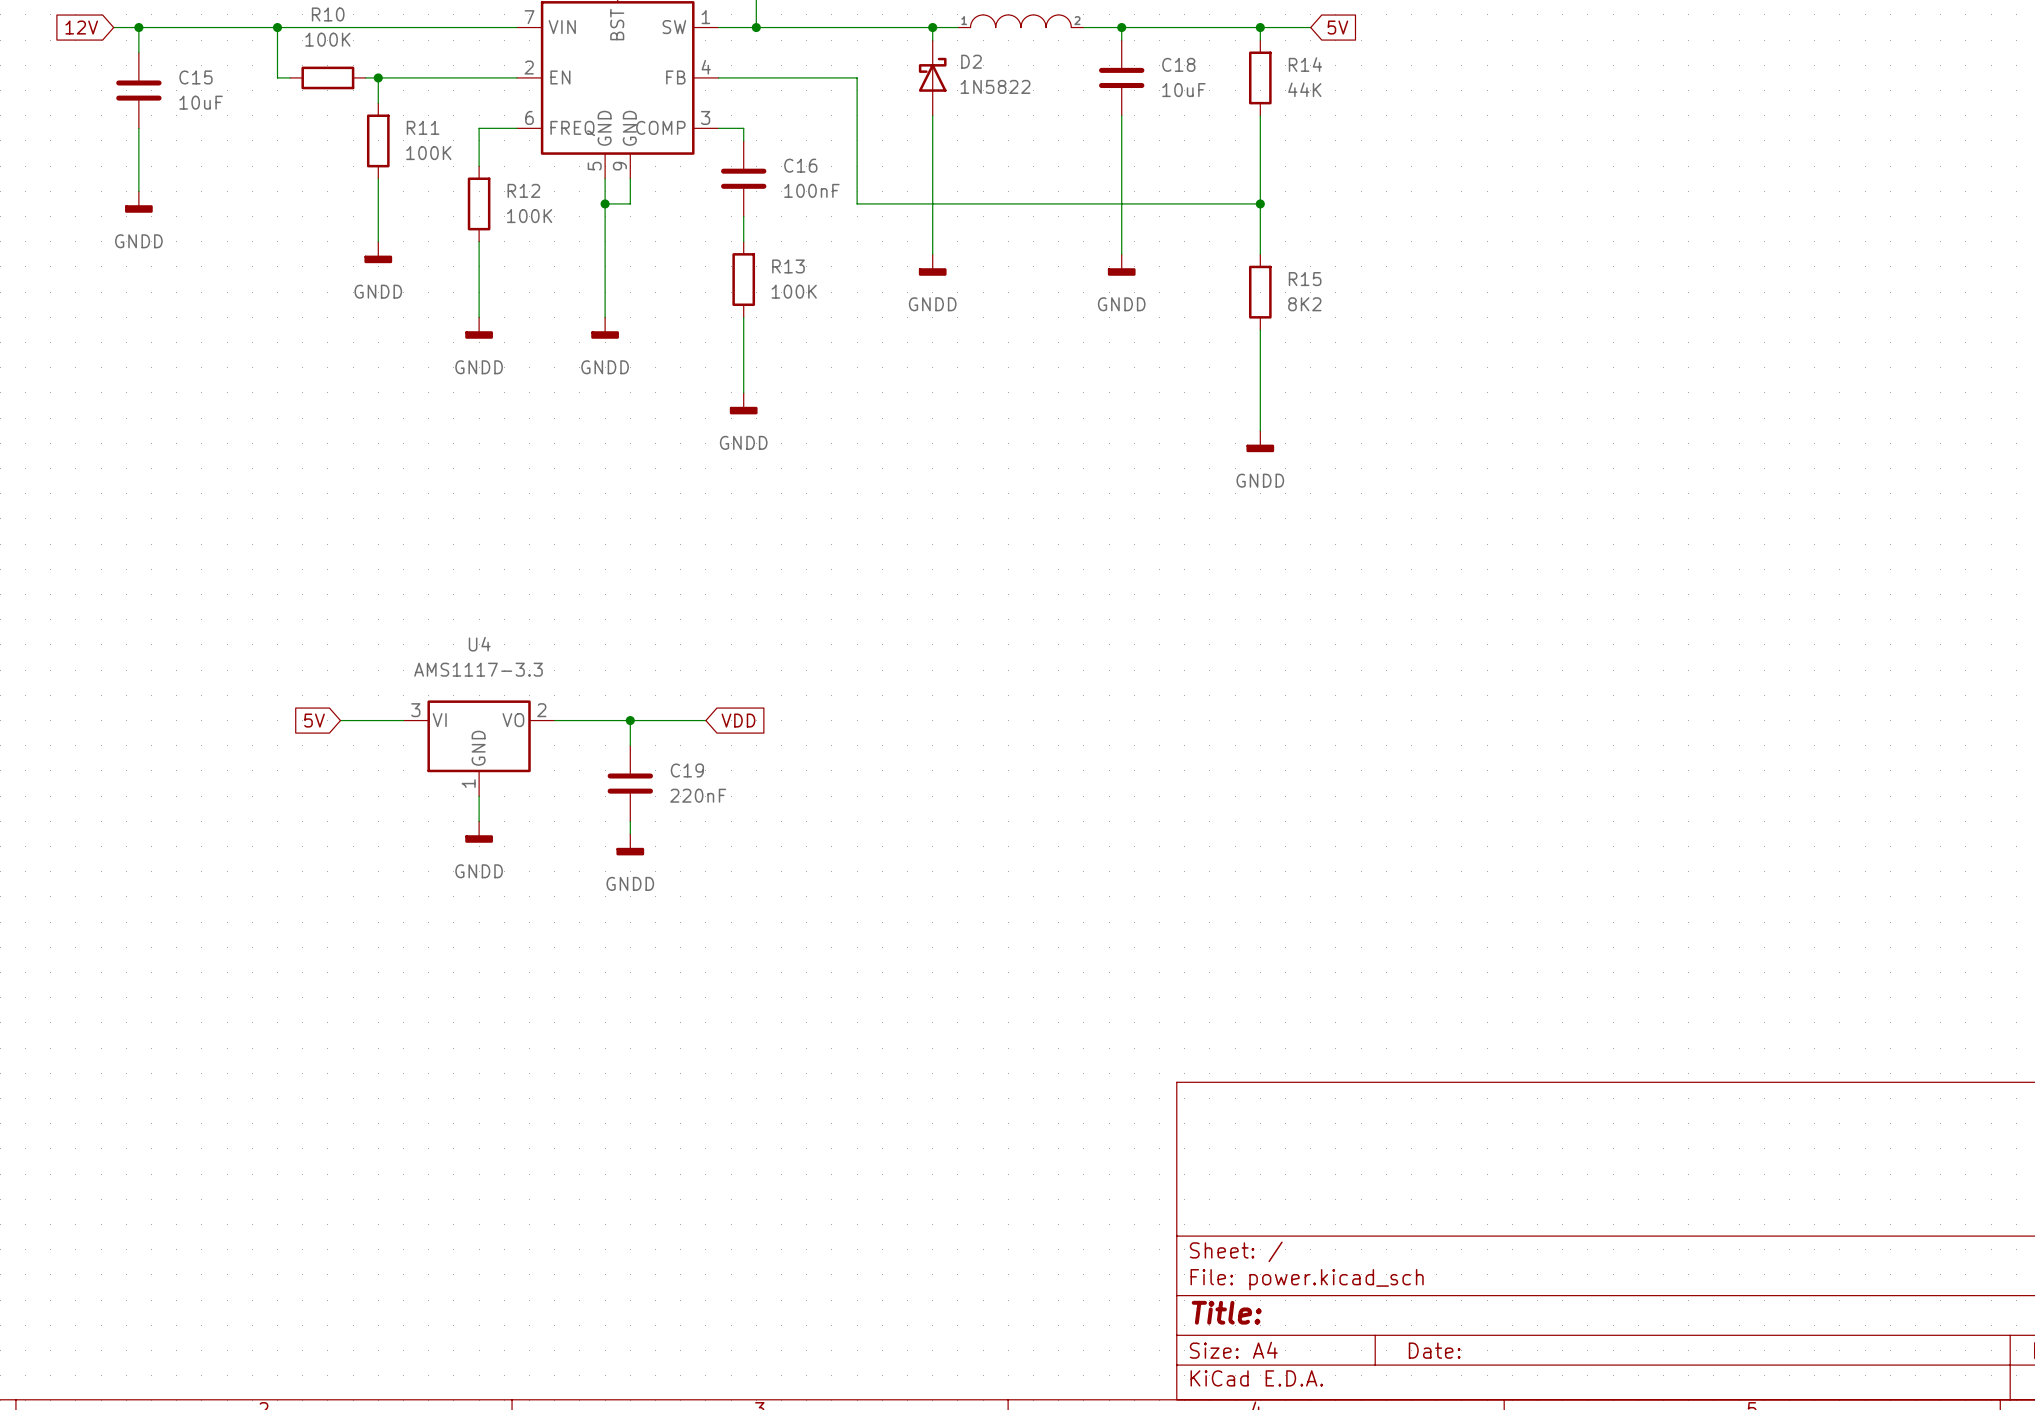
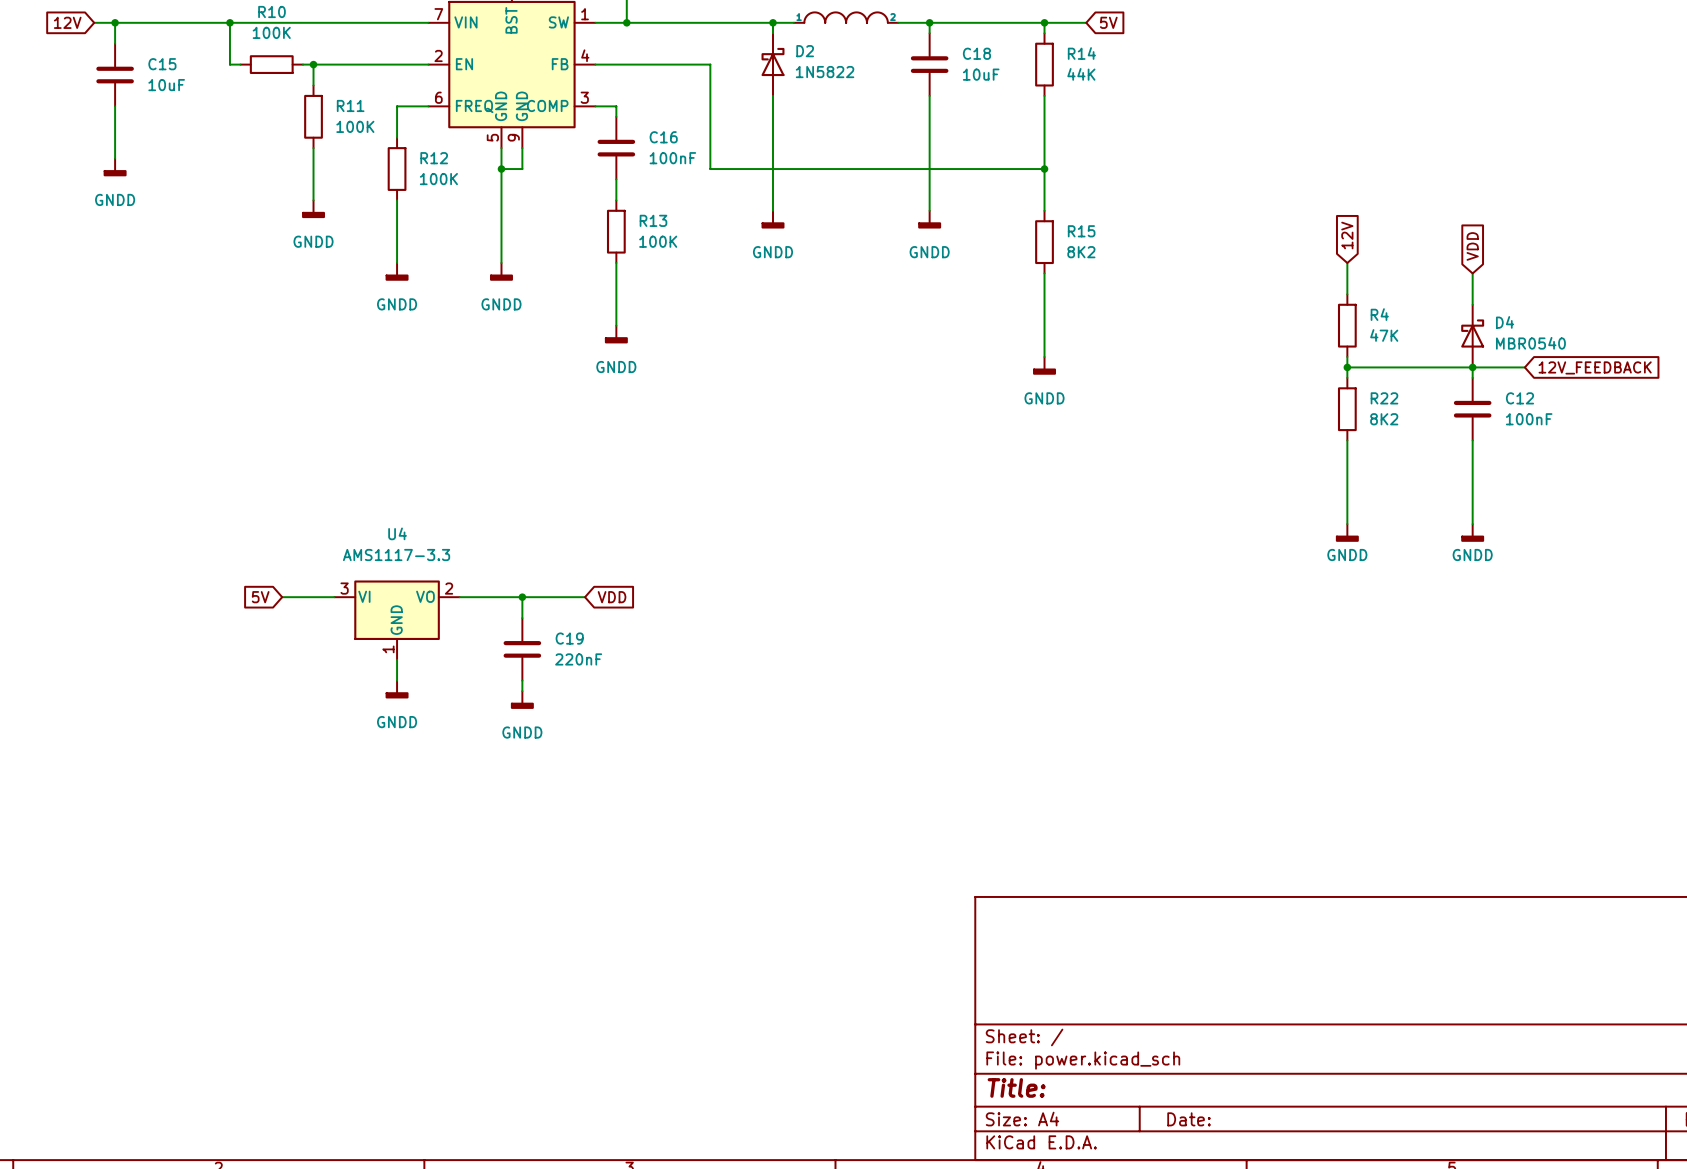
global label: none -> 12V (1347, 235)
global label: none -> VDD (1472, 246)
wire: none -> (1347, 263) (1347, 294)
wire: none -> (1472, 273) (1472, 304)
R4: none -> 47K (1347, 325)
D4: none -> MBR0540 (1472, 336)
wire: none -> (1347, 356) (1347, 377)
wire: none -> (1347, 367) (1524, 367)
junction: none -> (1347, 367)
wire: none -> (1472, 367) (1472, 377)
junction: none -> (1472, 367)
global label: none -> 12V_FEEDBACK (1595, 367)
R22: none -> 8K2 (1347, 409)
C12: none -> 100nF (1472, 409)
wire: none -> (1347, 440) (1347, 524)
wire: none -> (1472, 440) (1472, 524)
power symbol: none -> GNDD (1347, 532)
power symbol: none -> GNDD (1472, 532)

